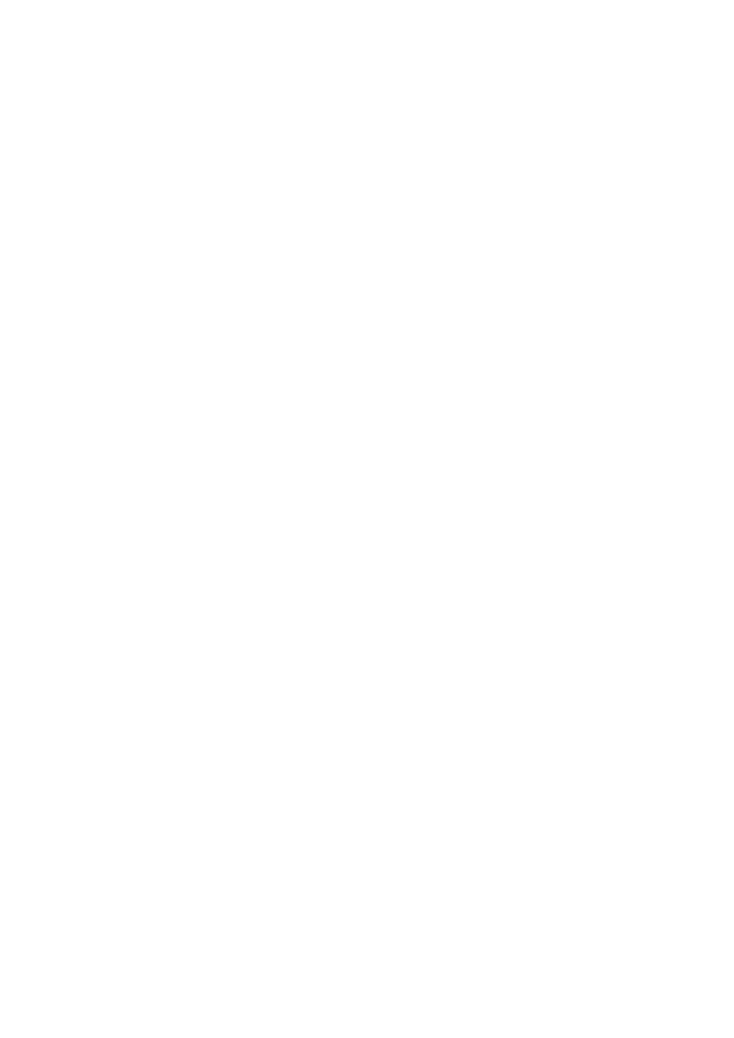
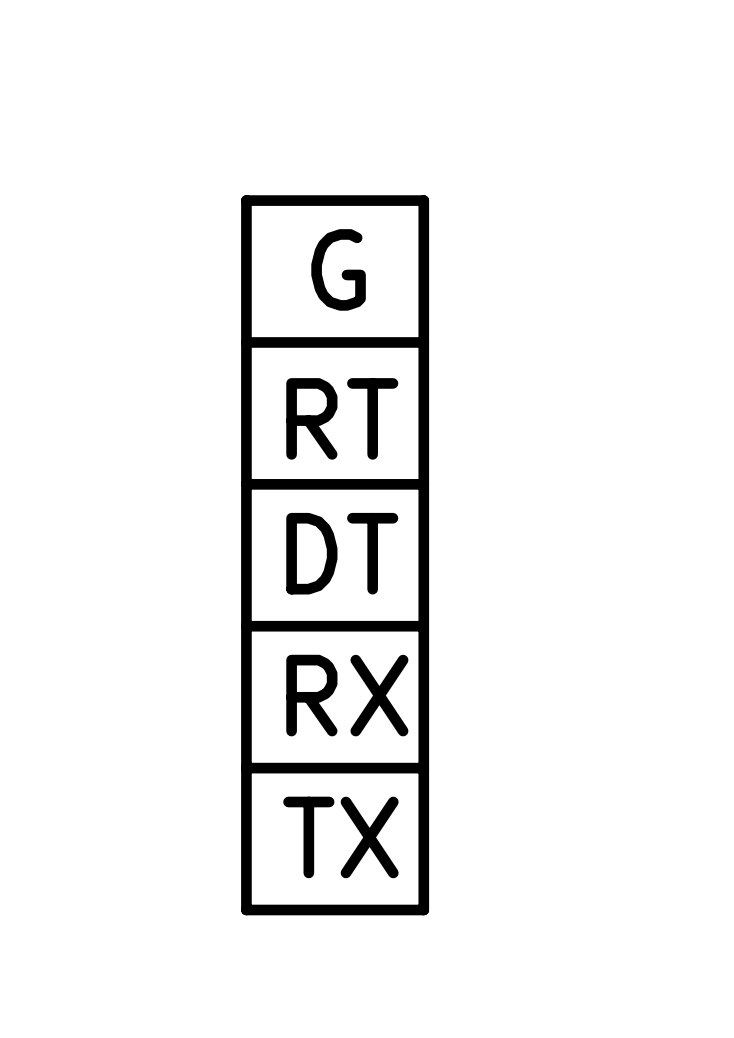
line: none -> (246, 200) (246, 909) (423, 909) (423, 200) (246, 200)
text: none -> G (338, 269)
line: none -> (246, 342) (423, 342)
text: none -> RT (342, 418)
line: none -> (246, 484) (423, 484)
text: none -> DT (342, 553)
line: none -> (246, 626) (423, 626)
text: none -> RX (347, 695)
line: none -> (246, 768) (423, 768)
text: none -> TX (340, 837)

